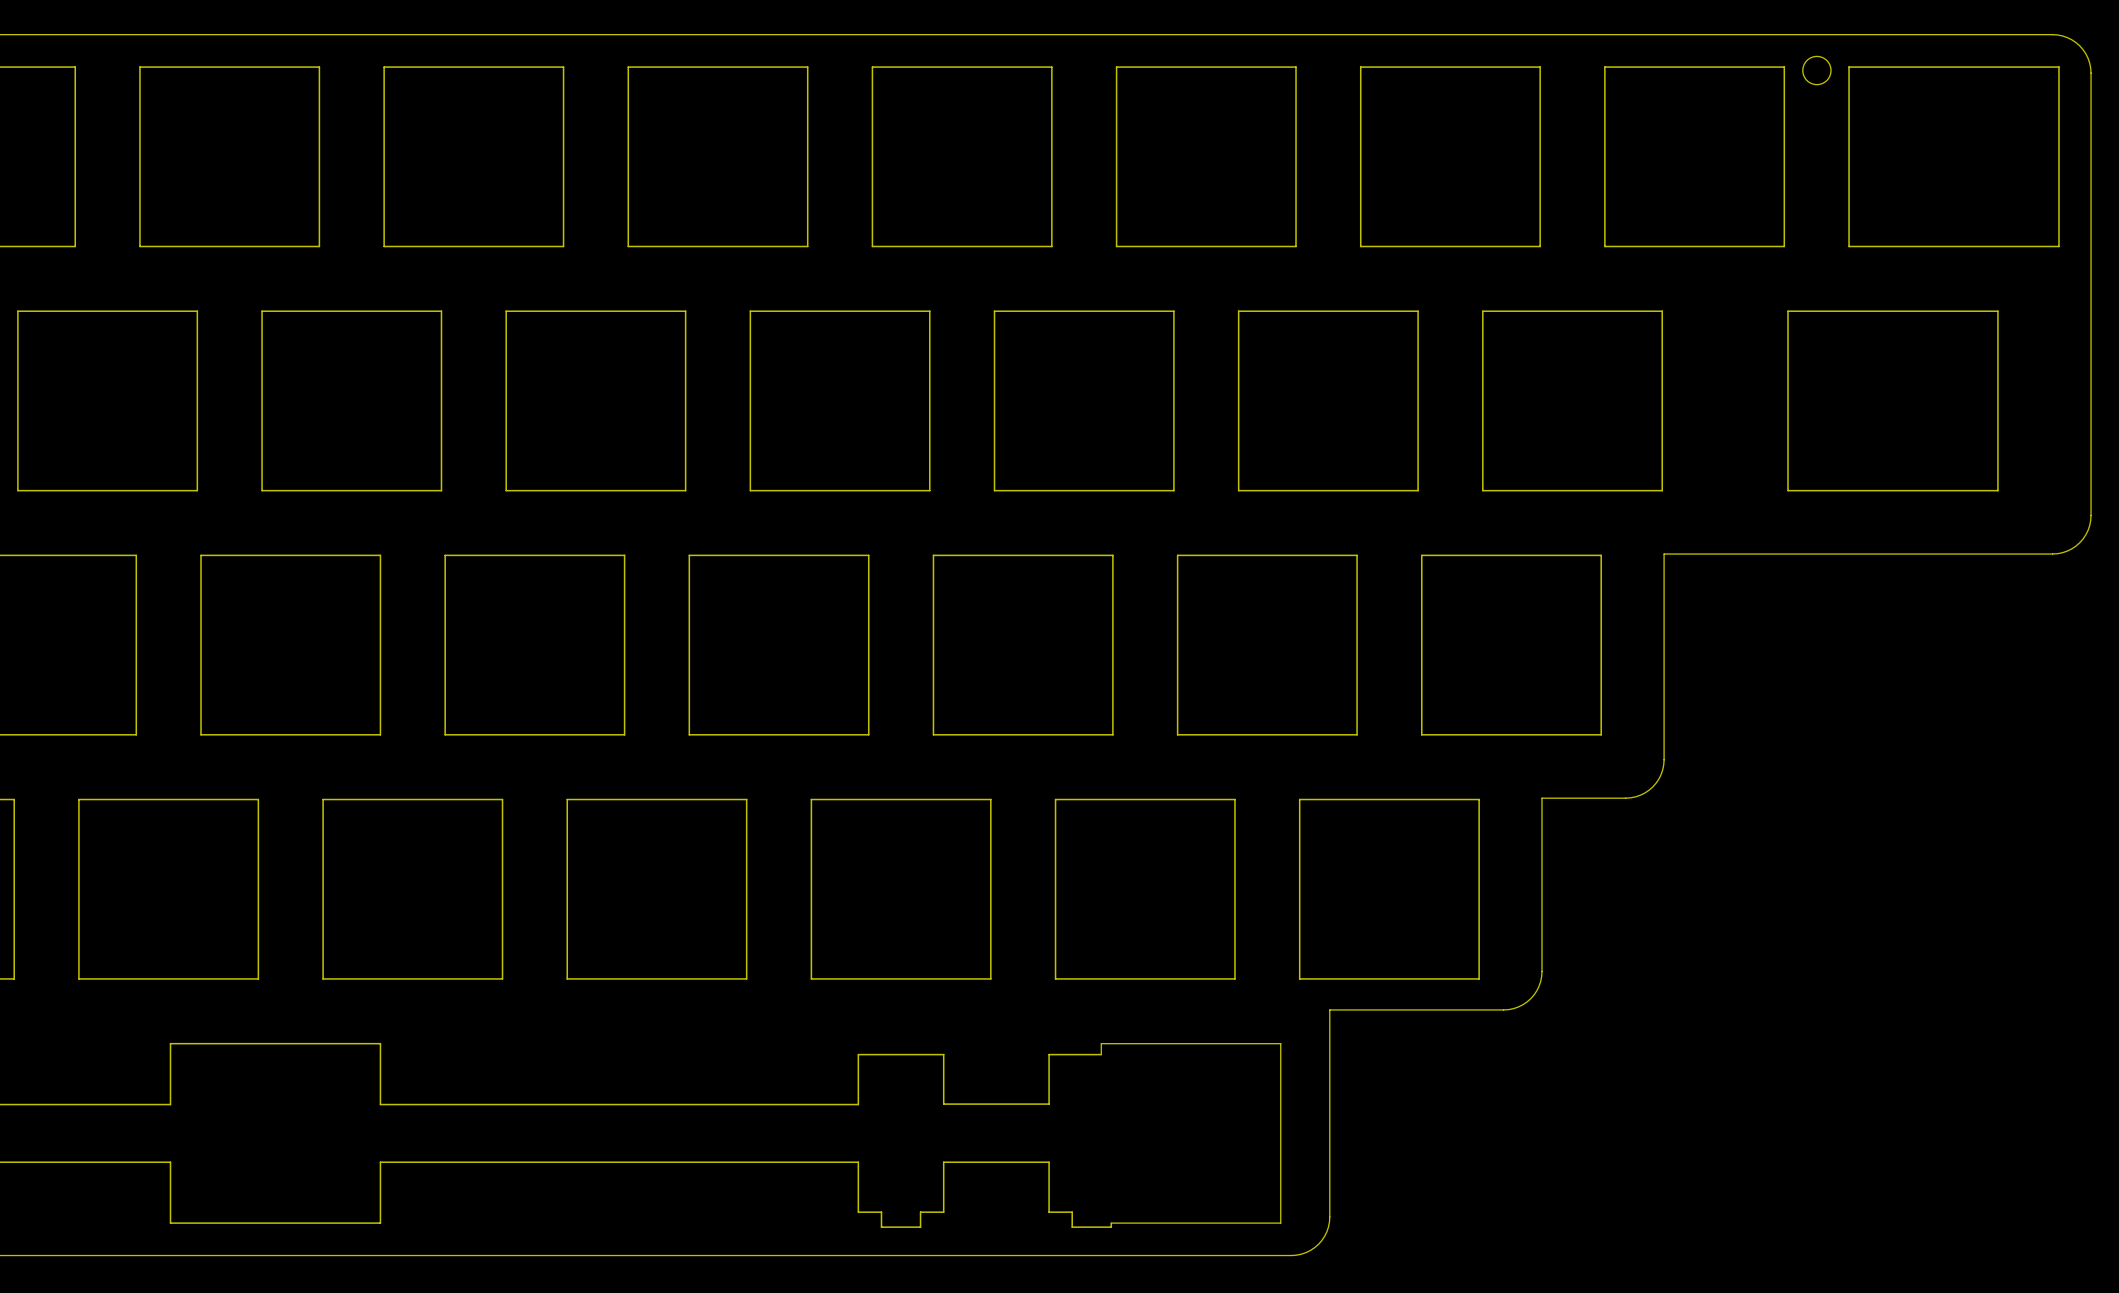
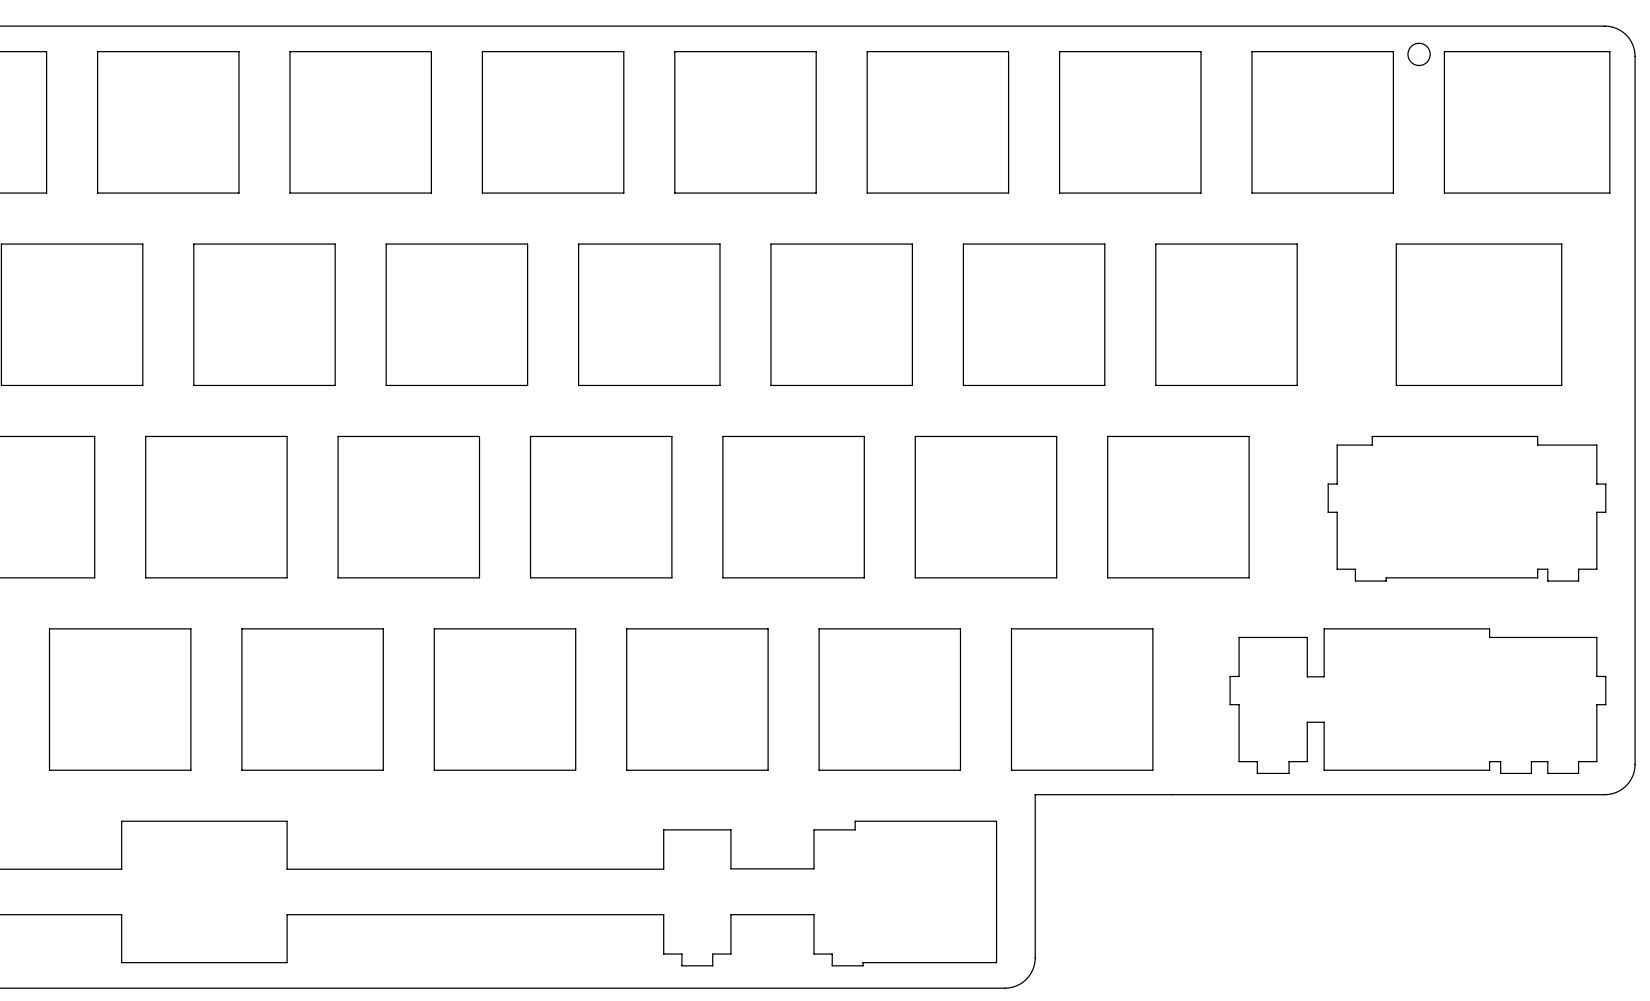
board edge: (2091, 515) (2089, 525) (2083, 538) (2071, 548) (2057, 553) (1664, 554) (1664, 759) (1661, 774) (1649, 790) (1635, 796) (1542, 798) (1541, 976) (1536, 990) (1526, 1002) (1513, 1008) (1503, 1009) -> (1635, 405) (1635, 764) (1631, 779) (1623, 788) (1616, 792) (1604, 794) (1172, 794)
drawing: none -> [1327, 435, 1607, 582]
drawing: none -> [1229, 628, 1607, 775]

